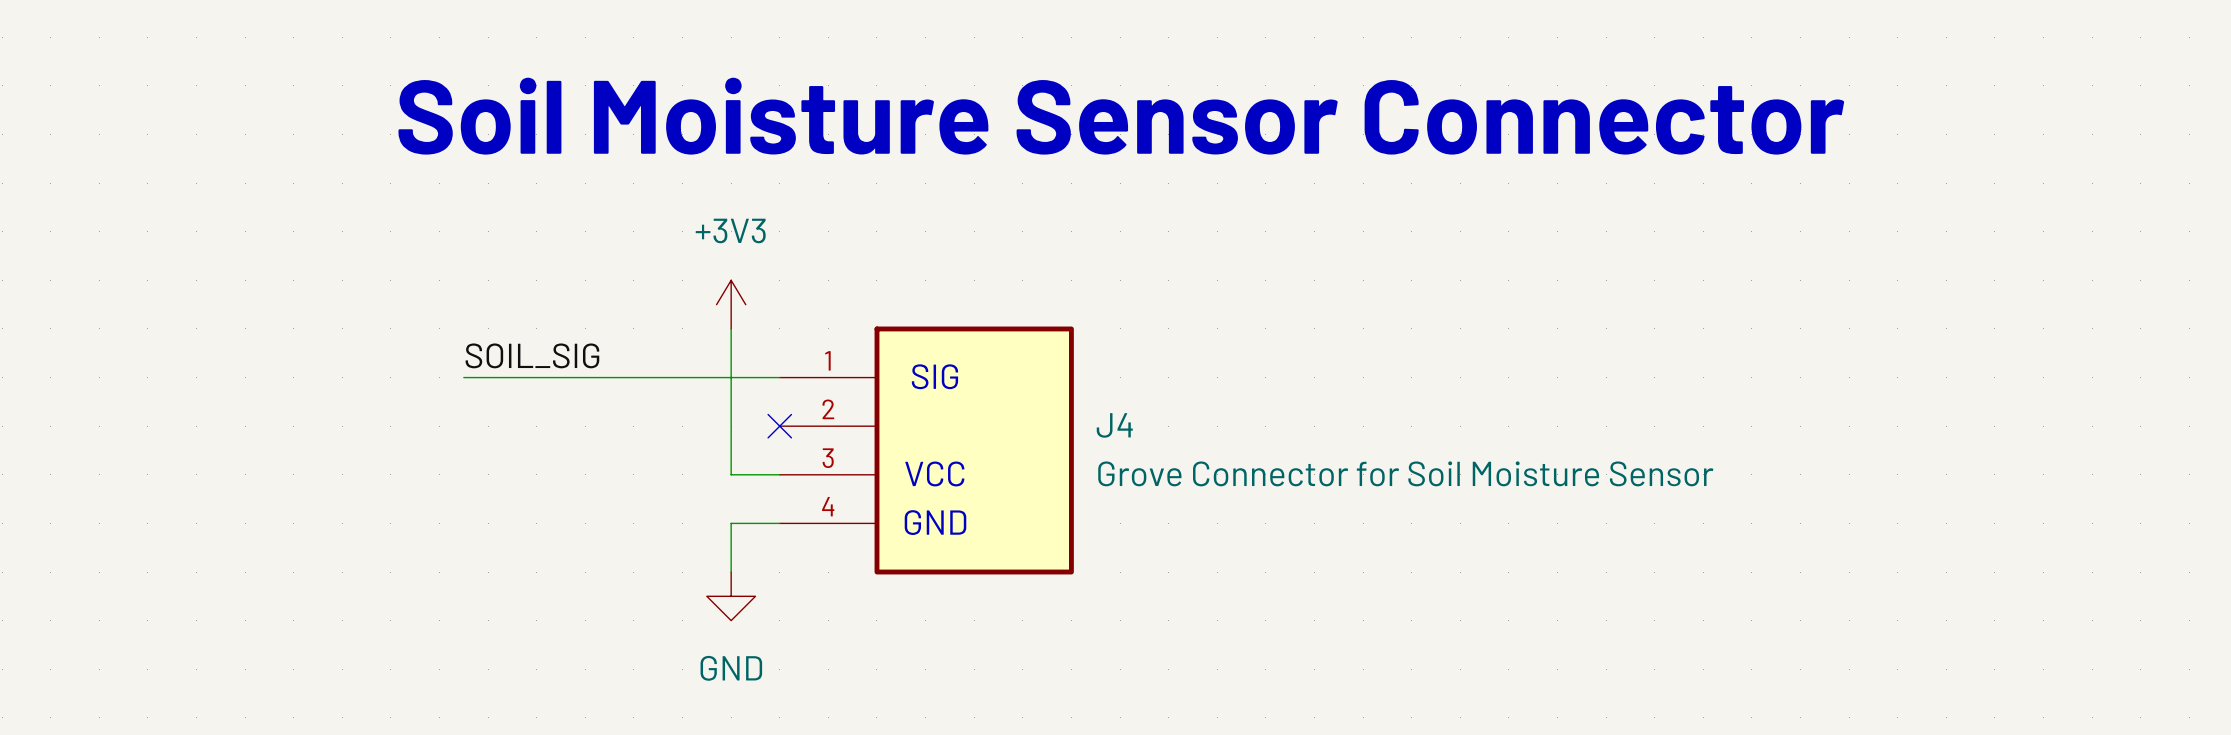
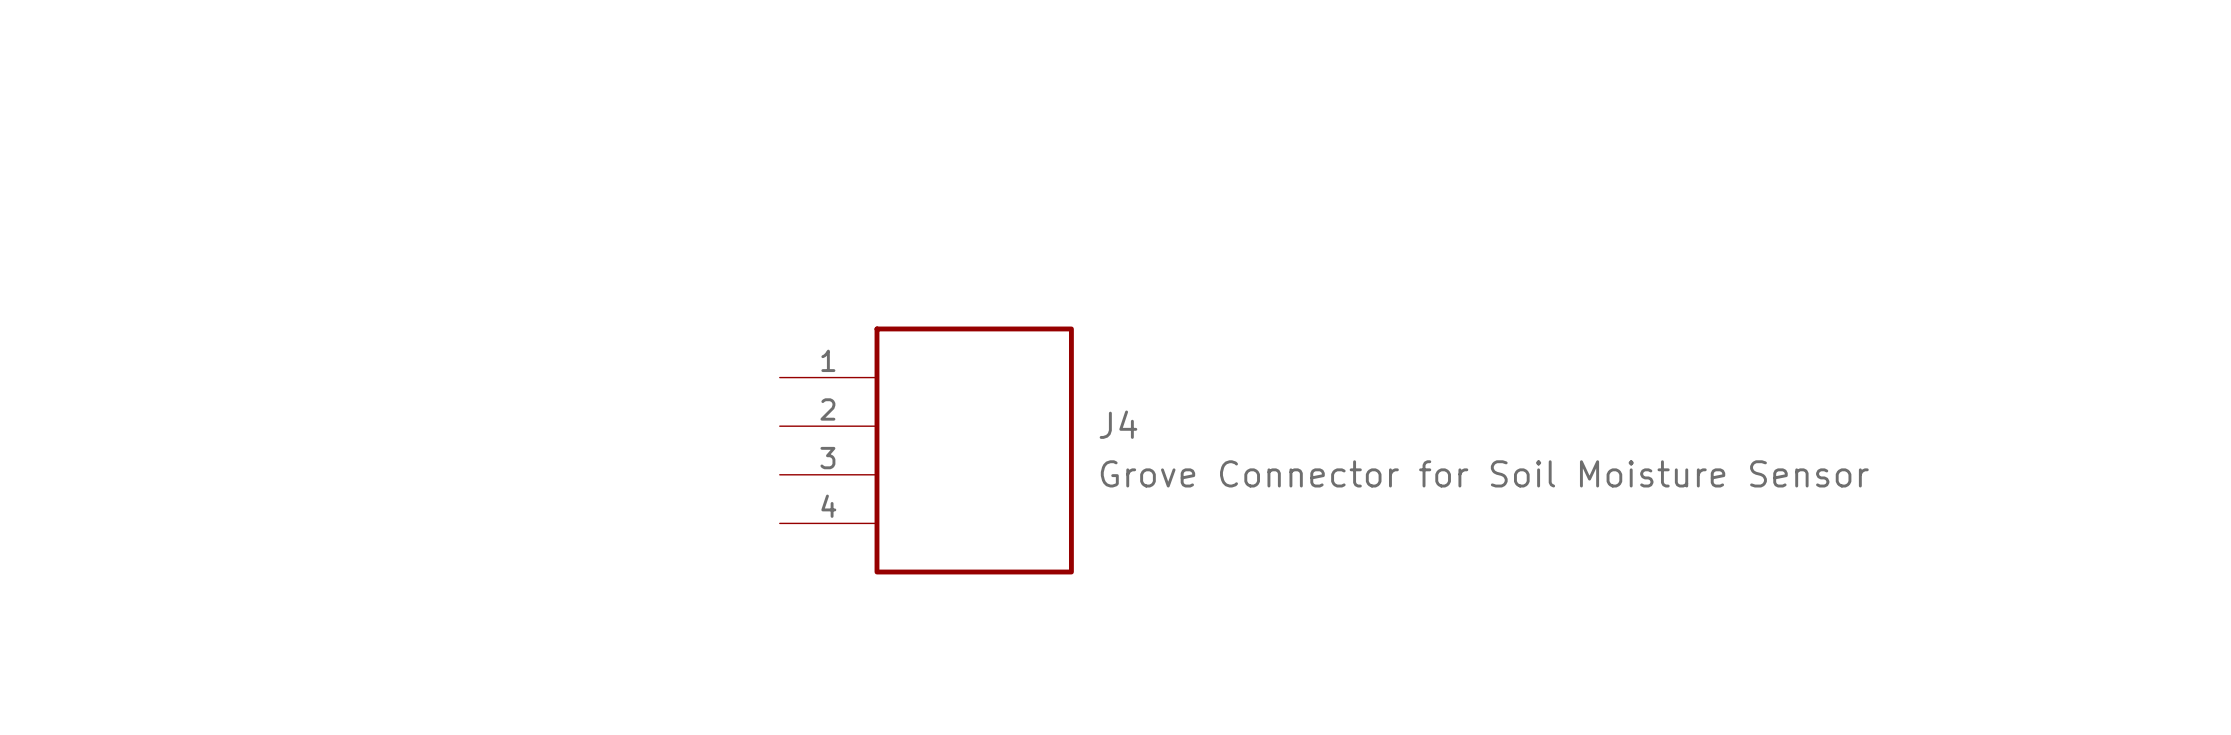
text: Soil Moisture Sensor Connector (1121, 116) -> none
power symbol: +3V3 (731, 304) -> none
wire: (731, 328) (731, 474) (779, 474) -> none
label: SOIL_SIG (532, 355) -> none
text: SIG (934, 376) -> none
wire: (463, 377) (779, 377) -> none
no-connect mark: (779, 426) -> none
text: VCC (934, 473) -> none
text: GND (935, 522) -> none
wire: (779, 523) (731, 523) (731, 572) -> none
power symbol: GND (731, 596) -> none

